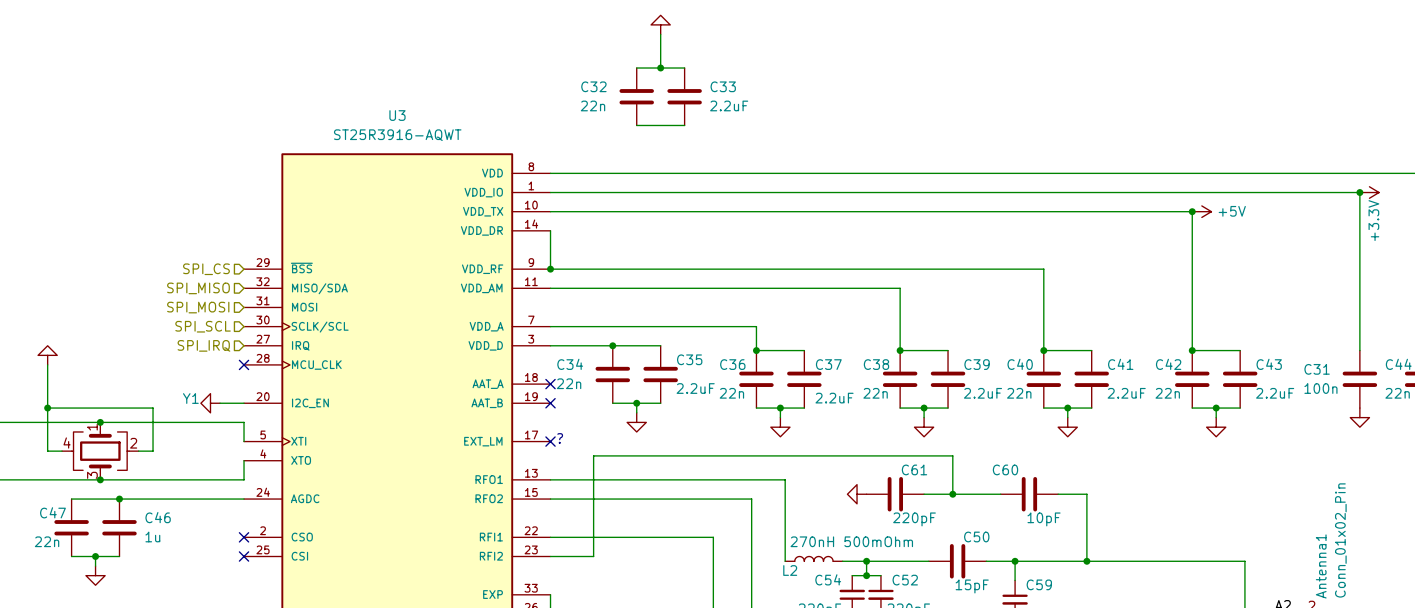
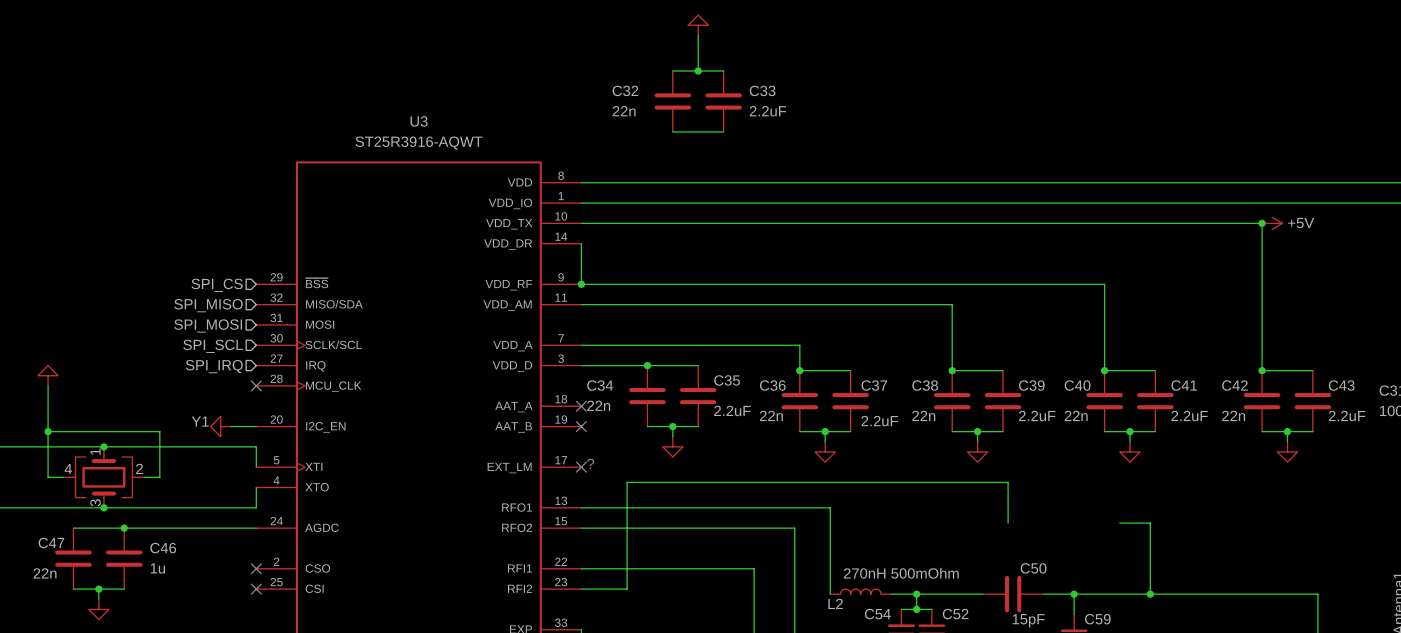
power symbol: (857, 494) -> none
C61: 220pF (895, 494) -> none
wire: (924, 494) (1000, 494) -> none
junction: (952, 494) -> none
C60: 10pF (1029, 494) -> none

